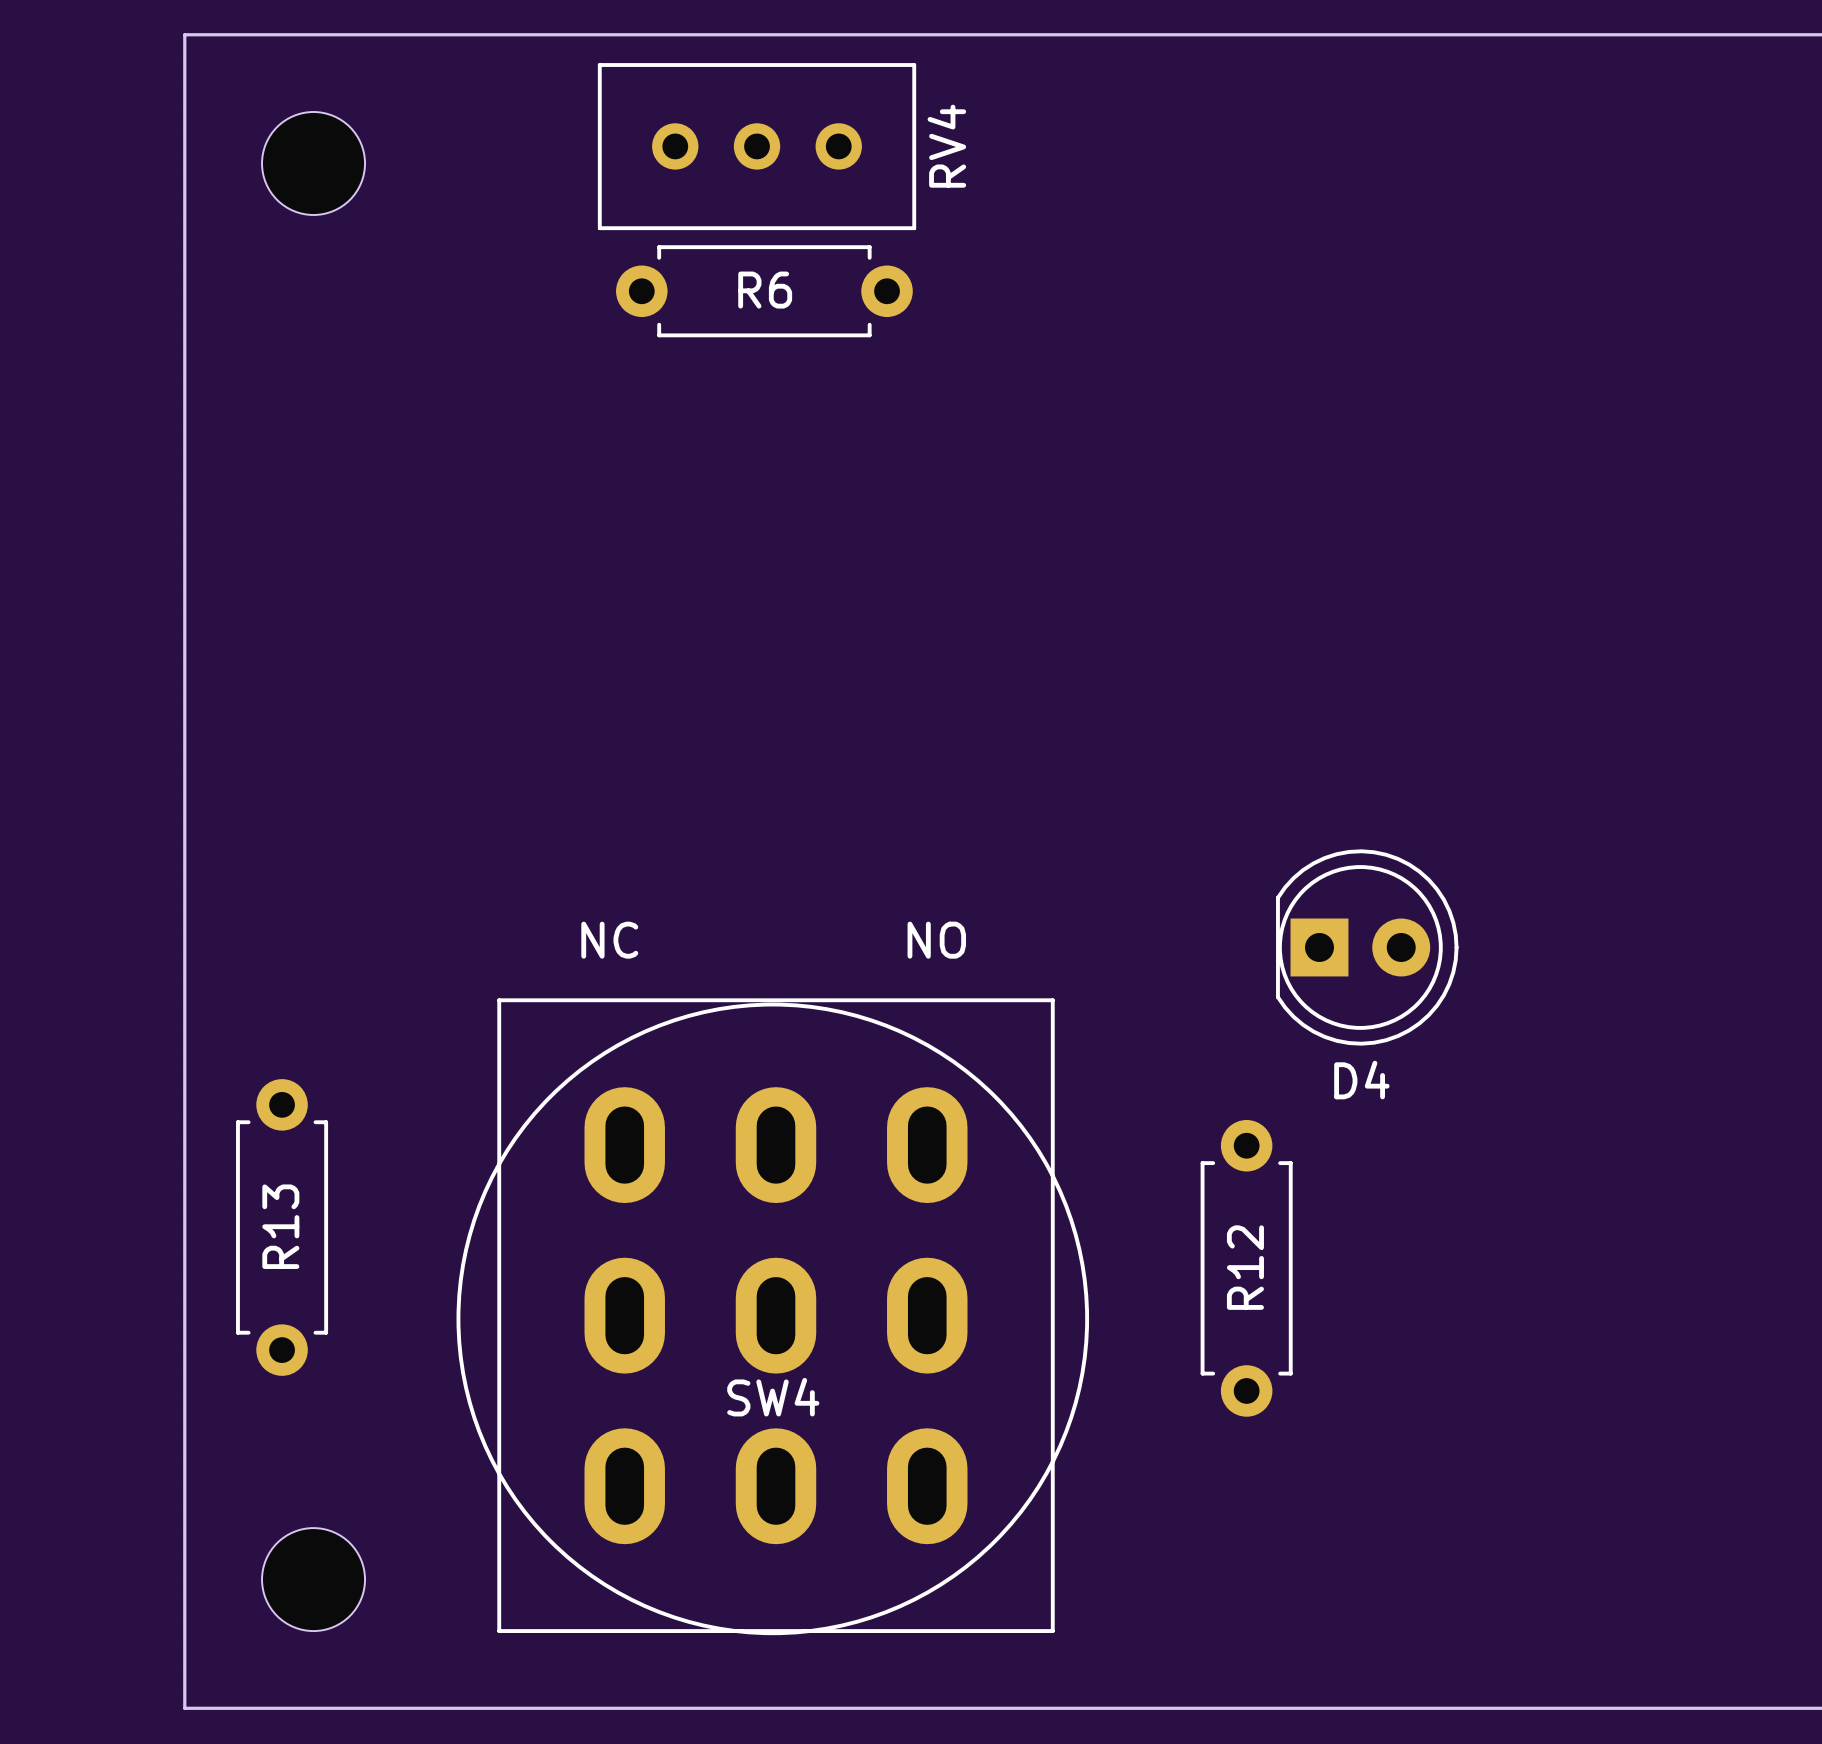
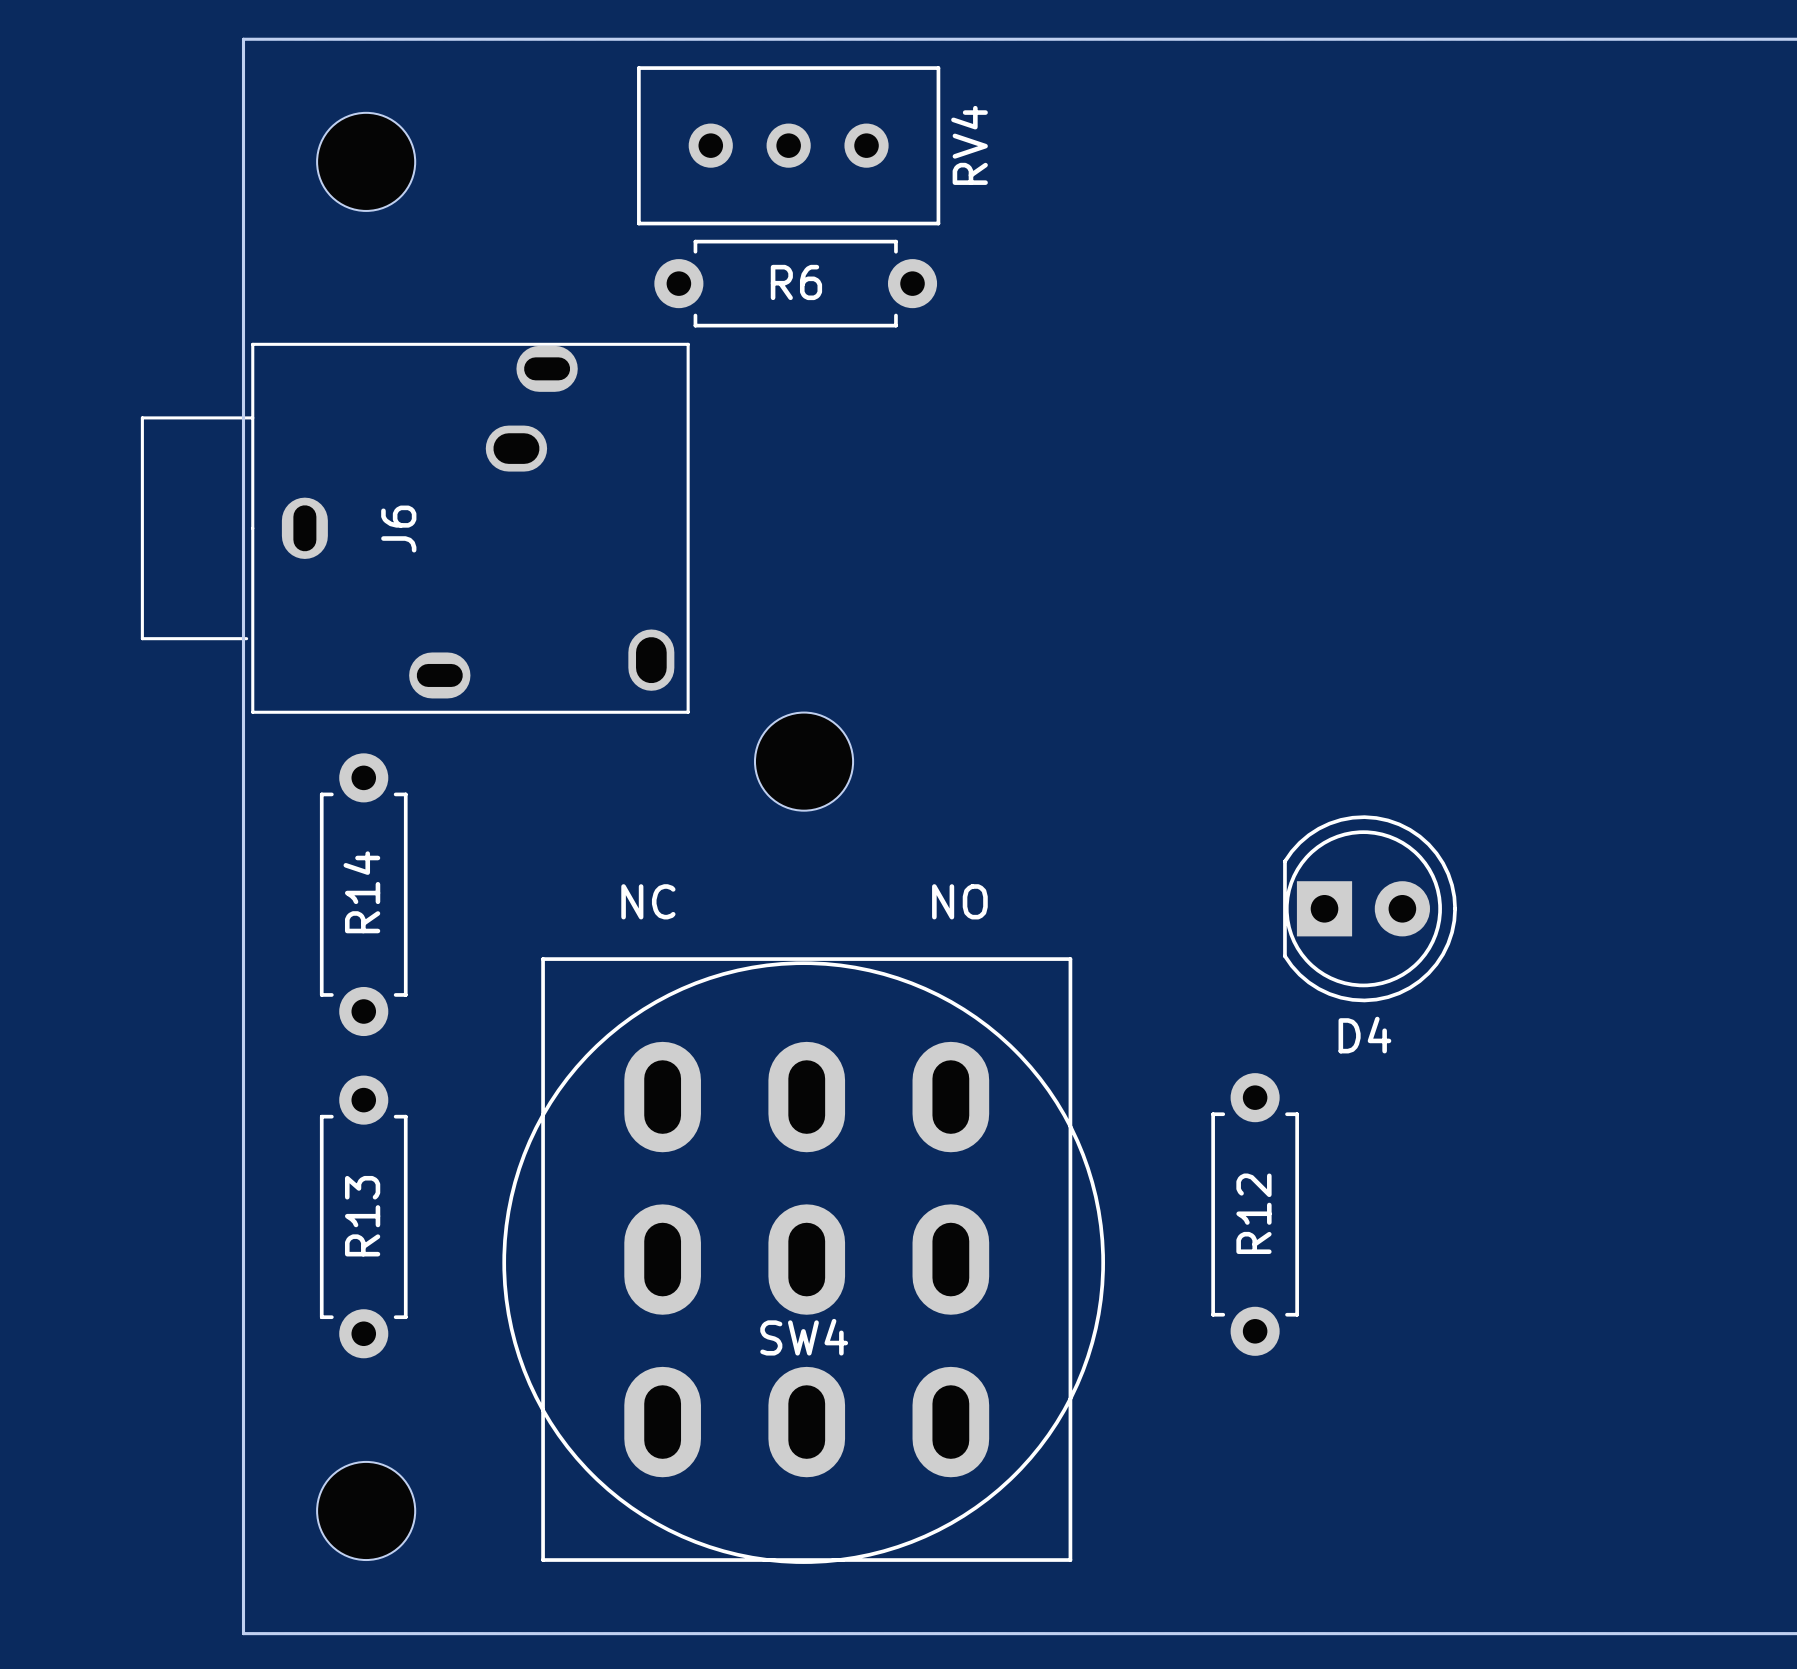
J6: none -> (415, 528)
part: none -> (804, 761)
R14: none -> (363, 894)
R13 position: (282, 1227) -> (363, 1216)

